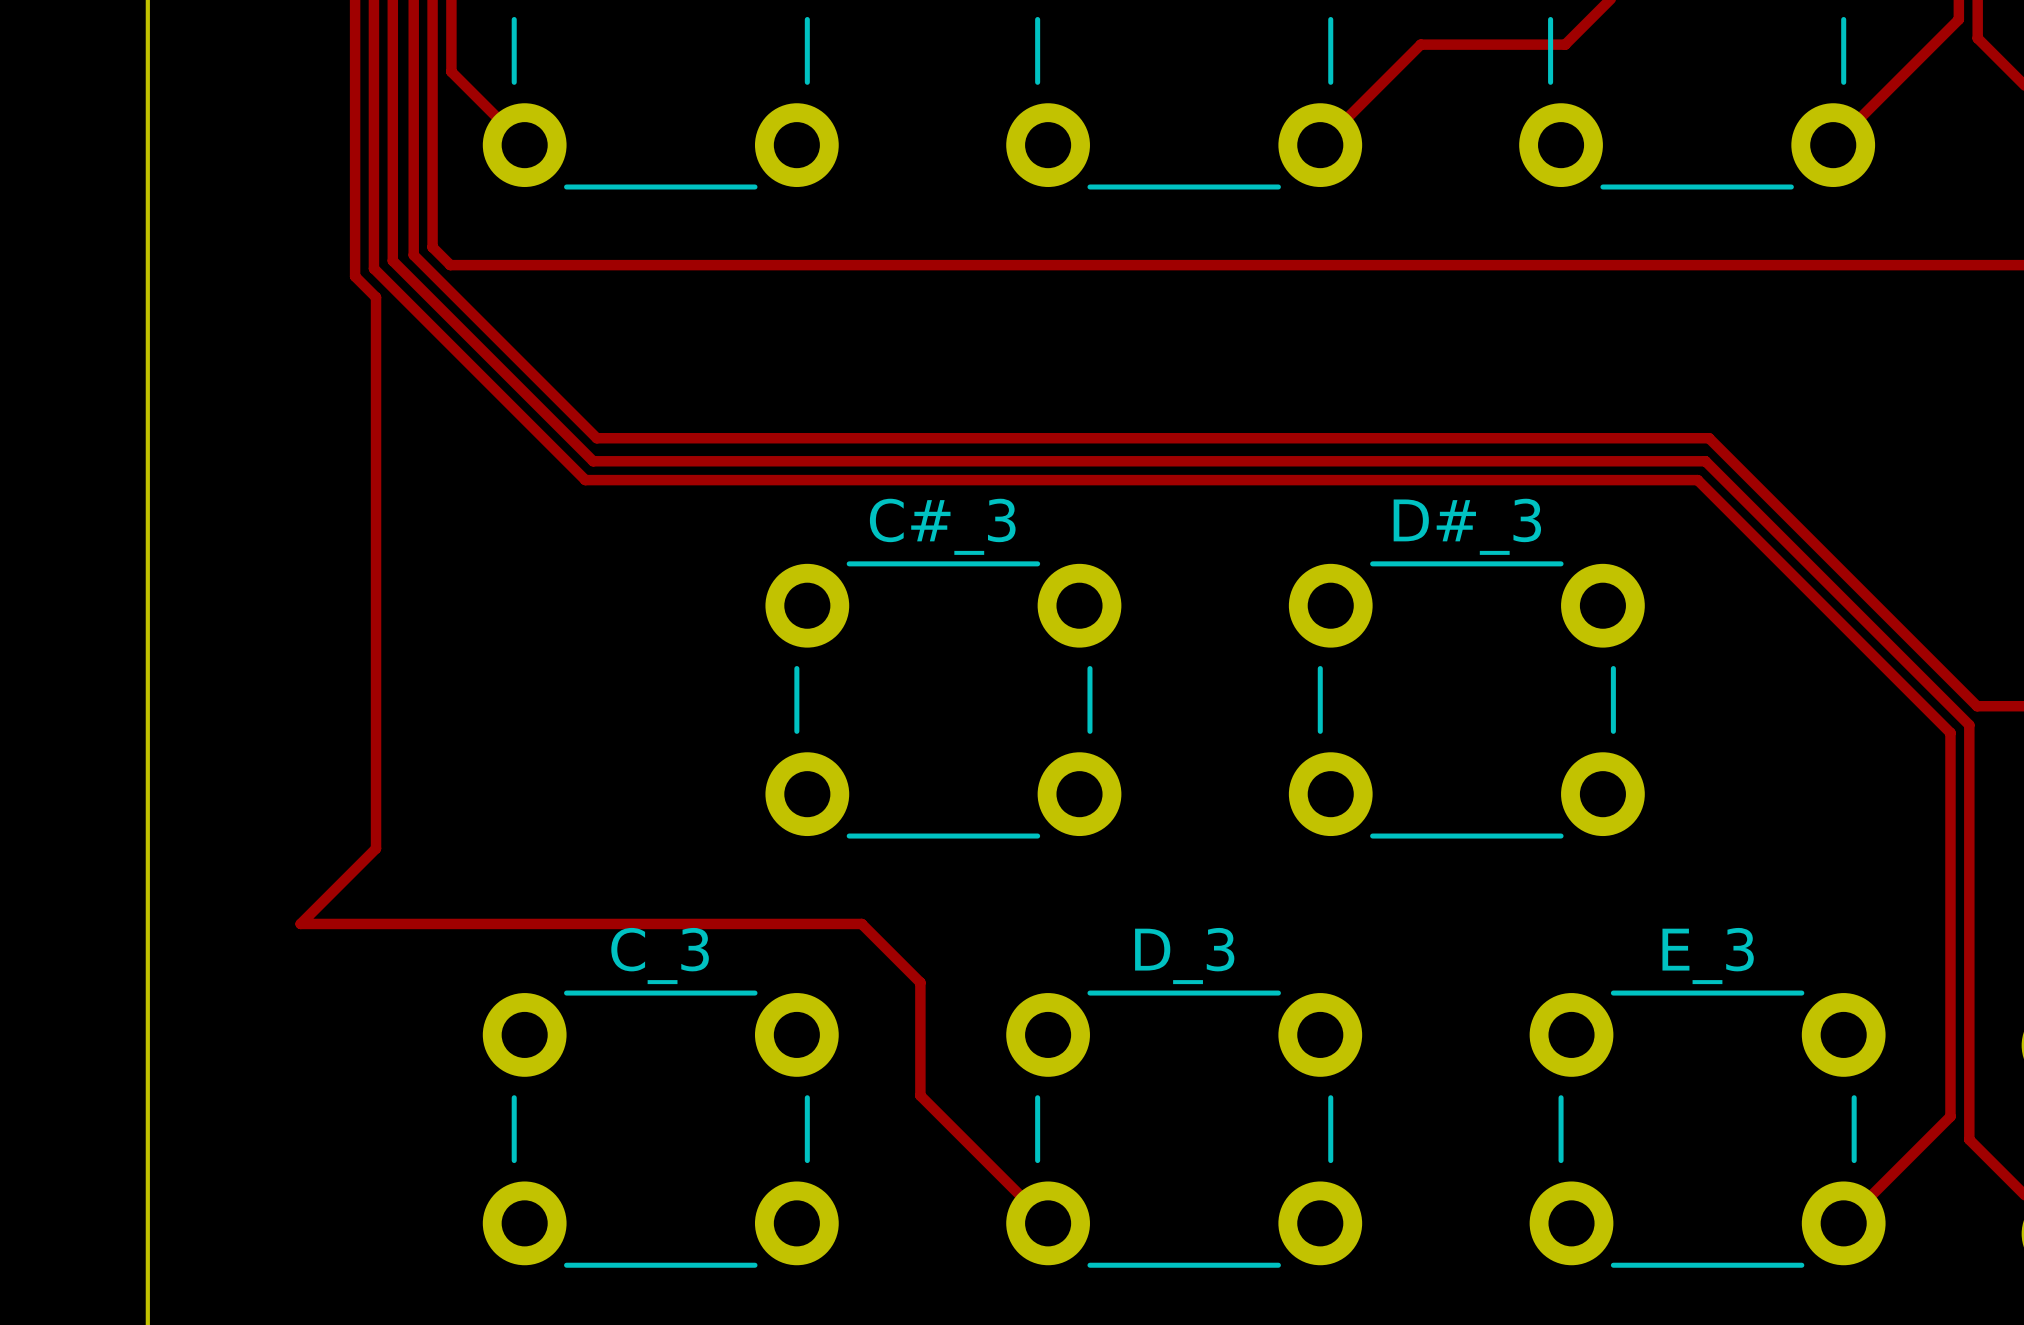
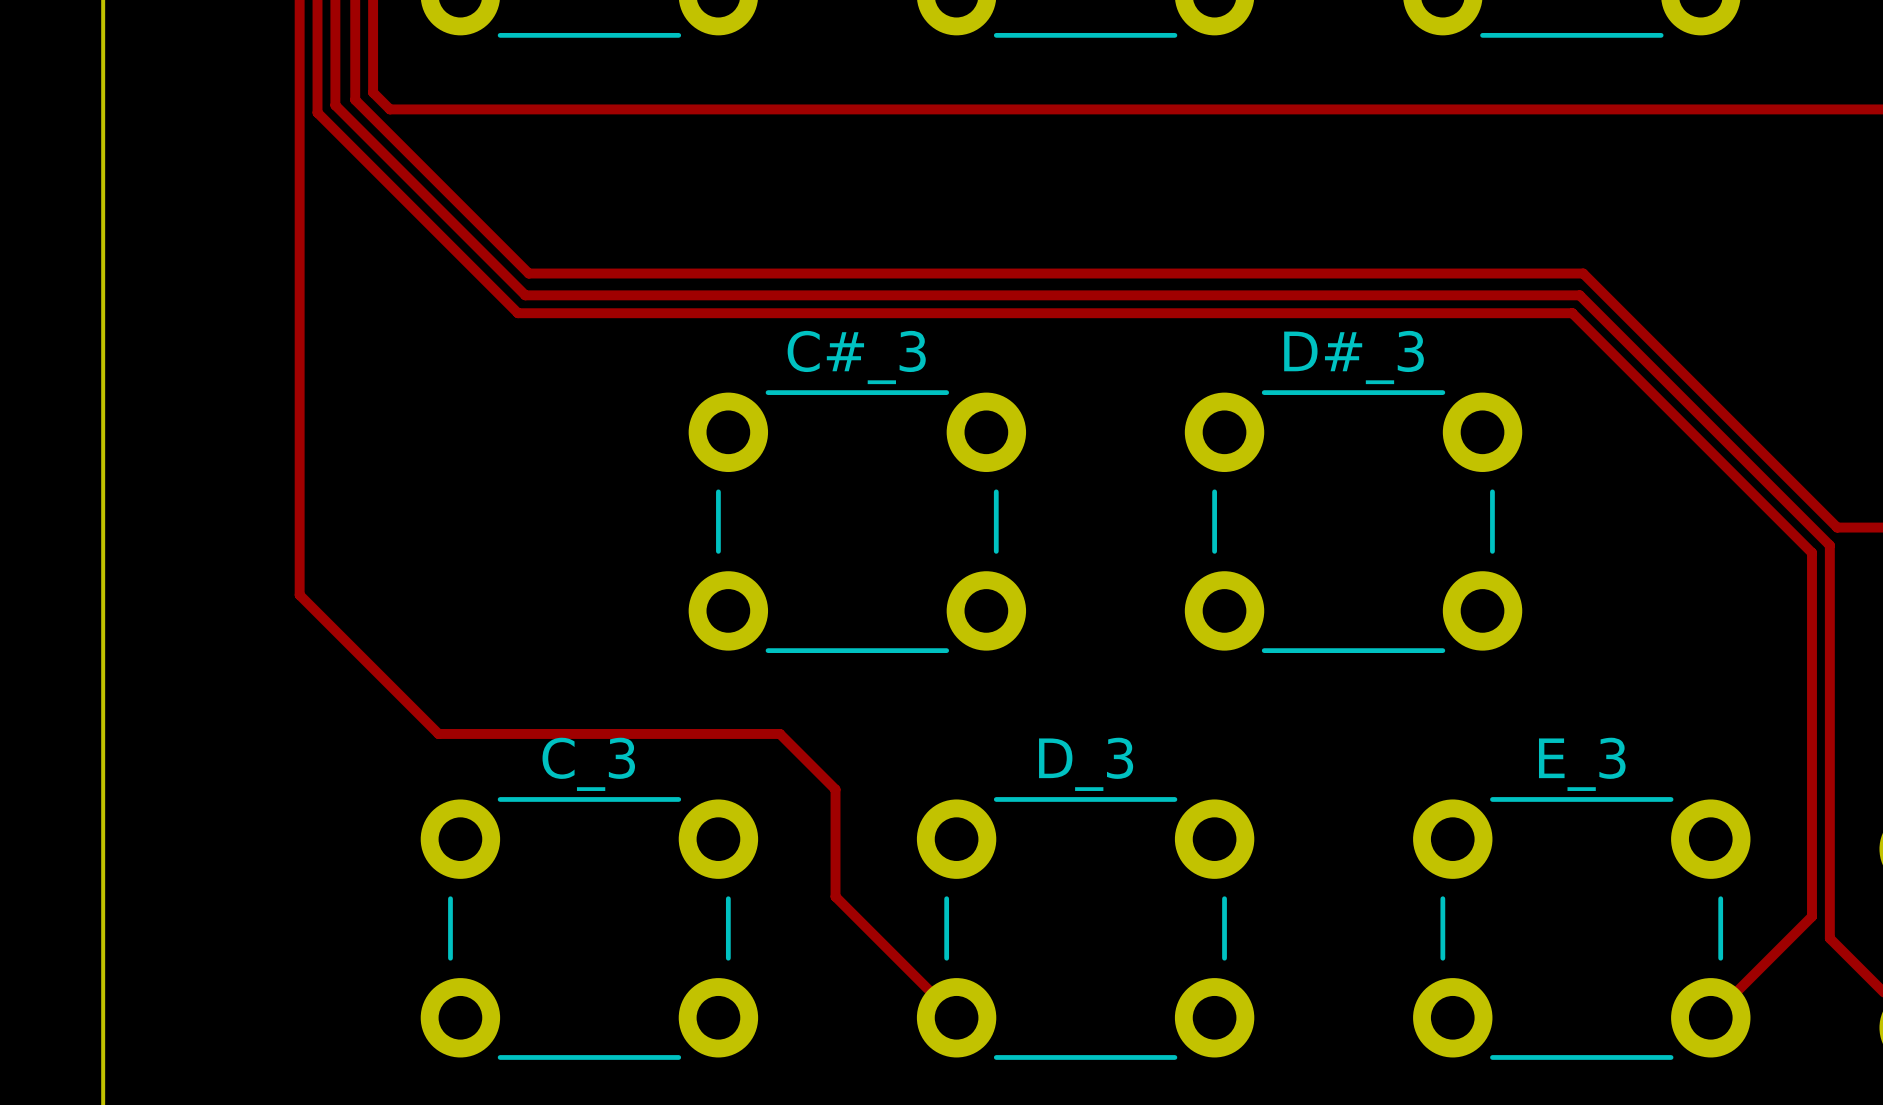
track: (355, 276) (376, 297) (376, 848) (300, 923) (501, 923) -> (299, 120) (299, 595) (438, 733)

